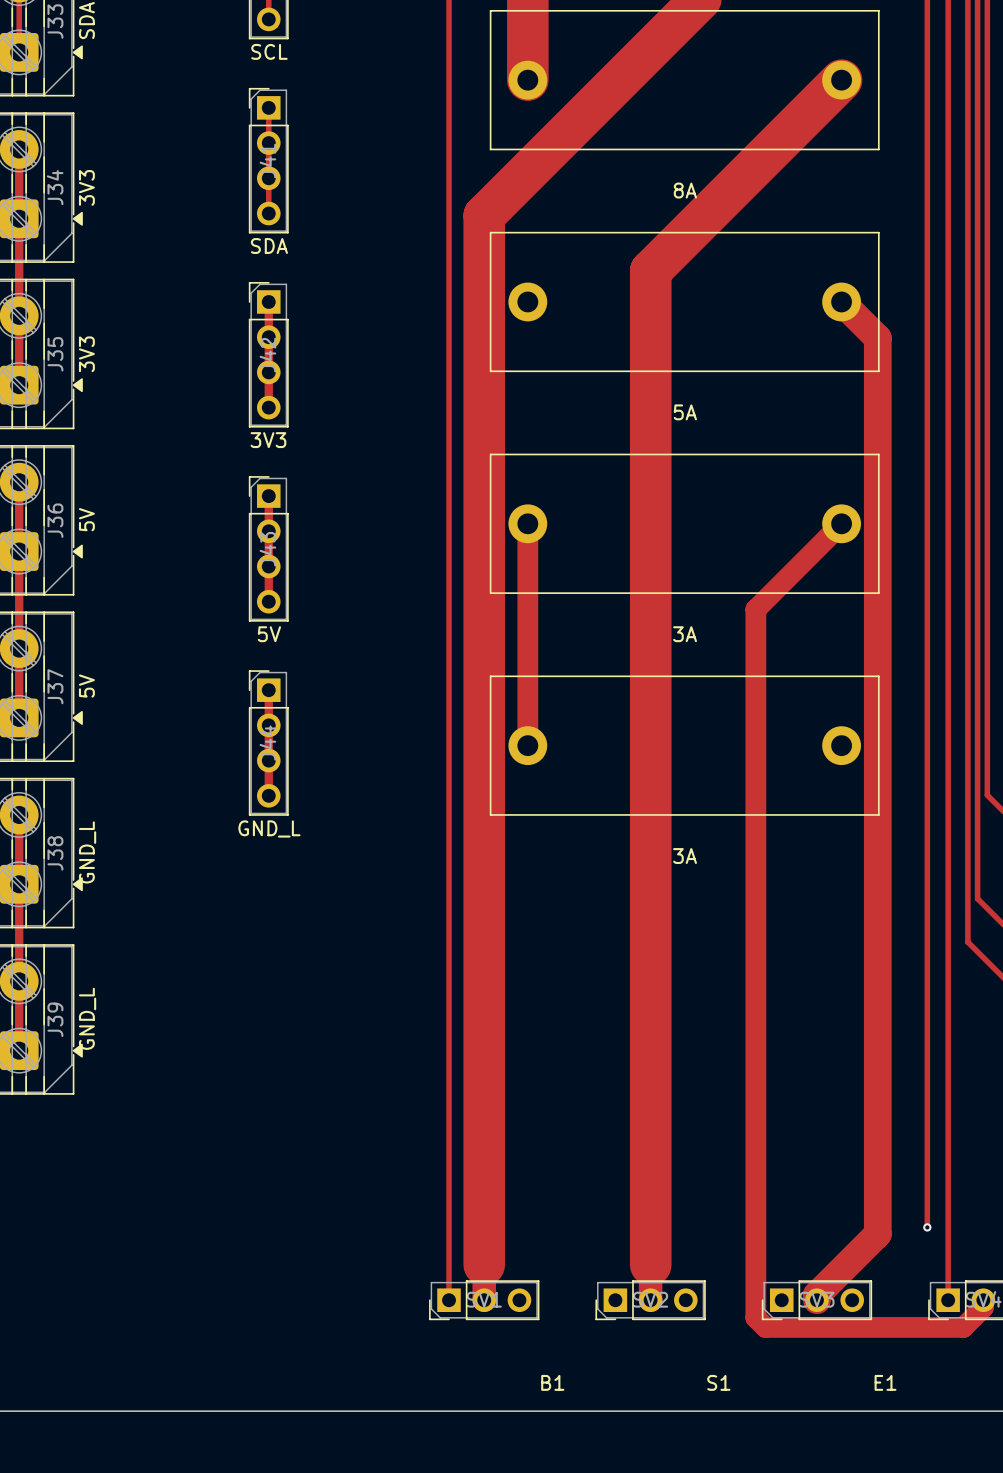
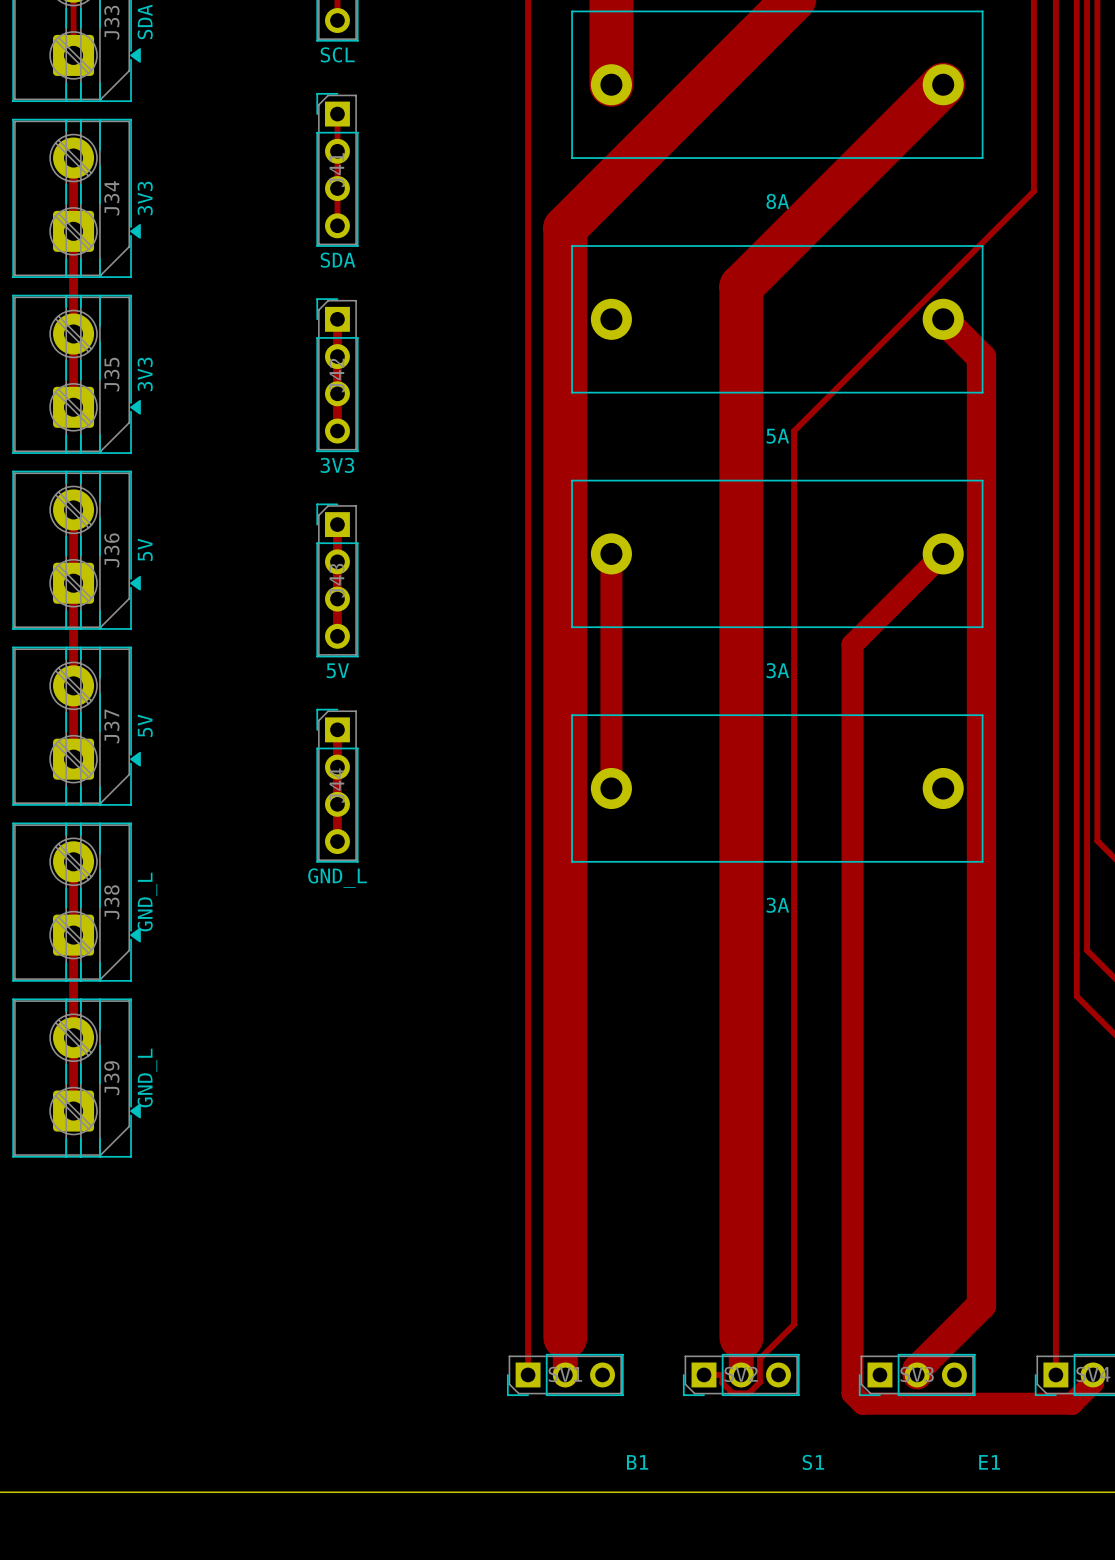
track: (927, 180) (927, 1227) -> (1033, 191) (794, 431) (794, 1324) (759, 1358) (759, 1382) (748, 1393) (732, 1393) (722, 1382) (722, 1374) (704, 1374)
via: (927, 1227) -> none

